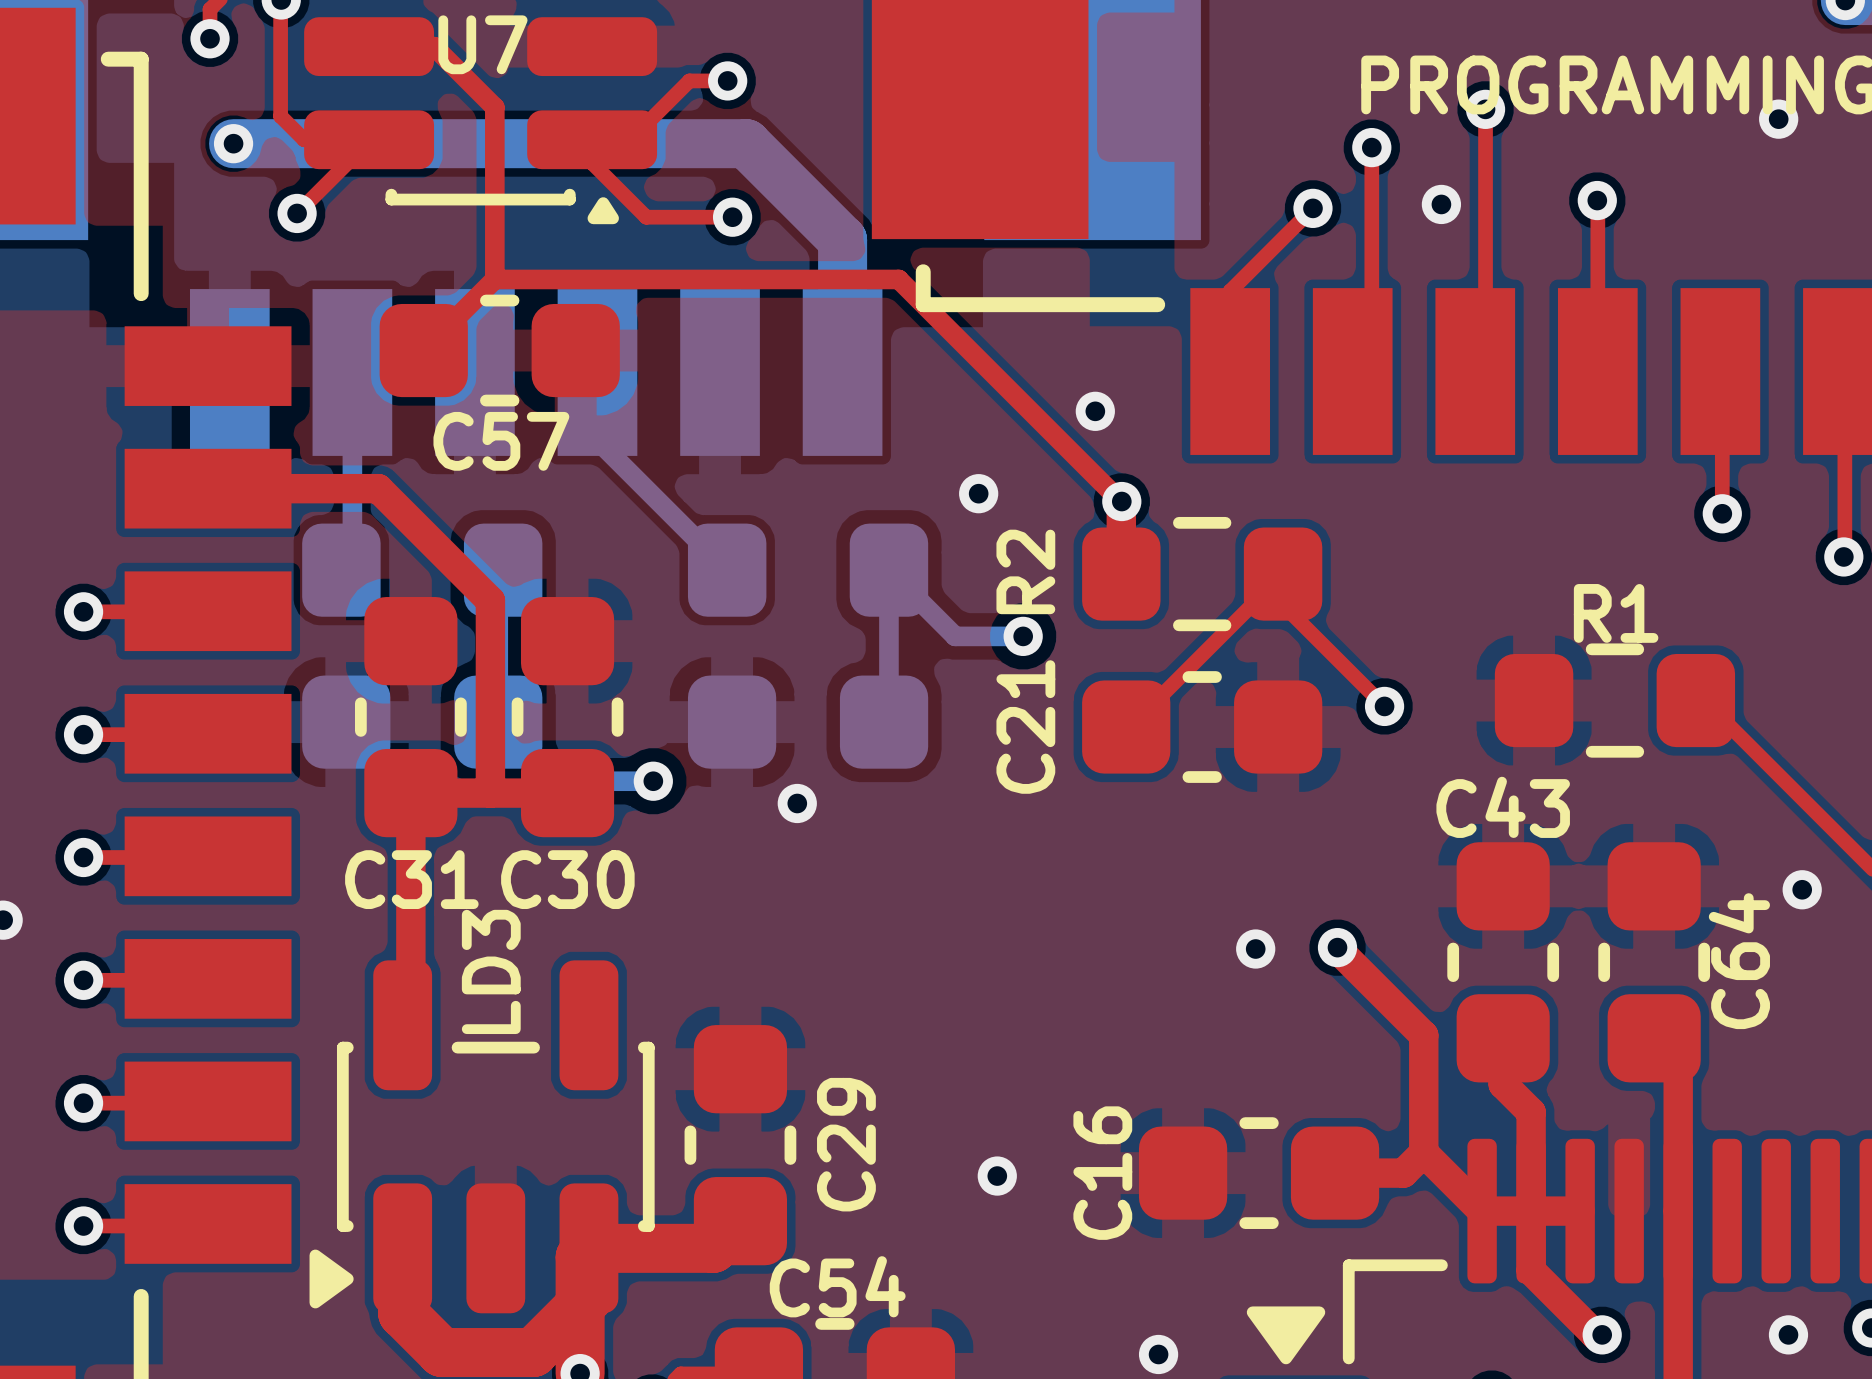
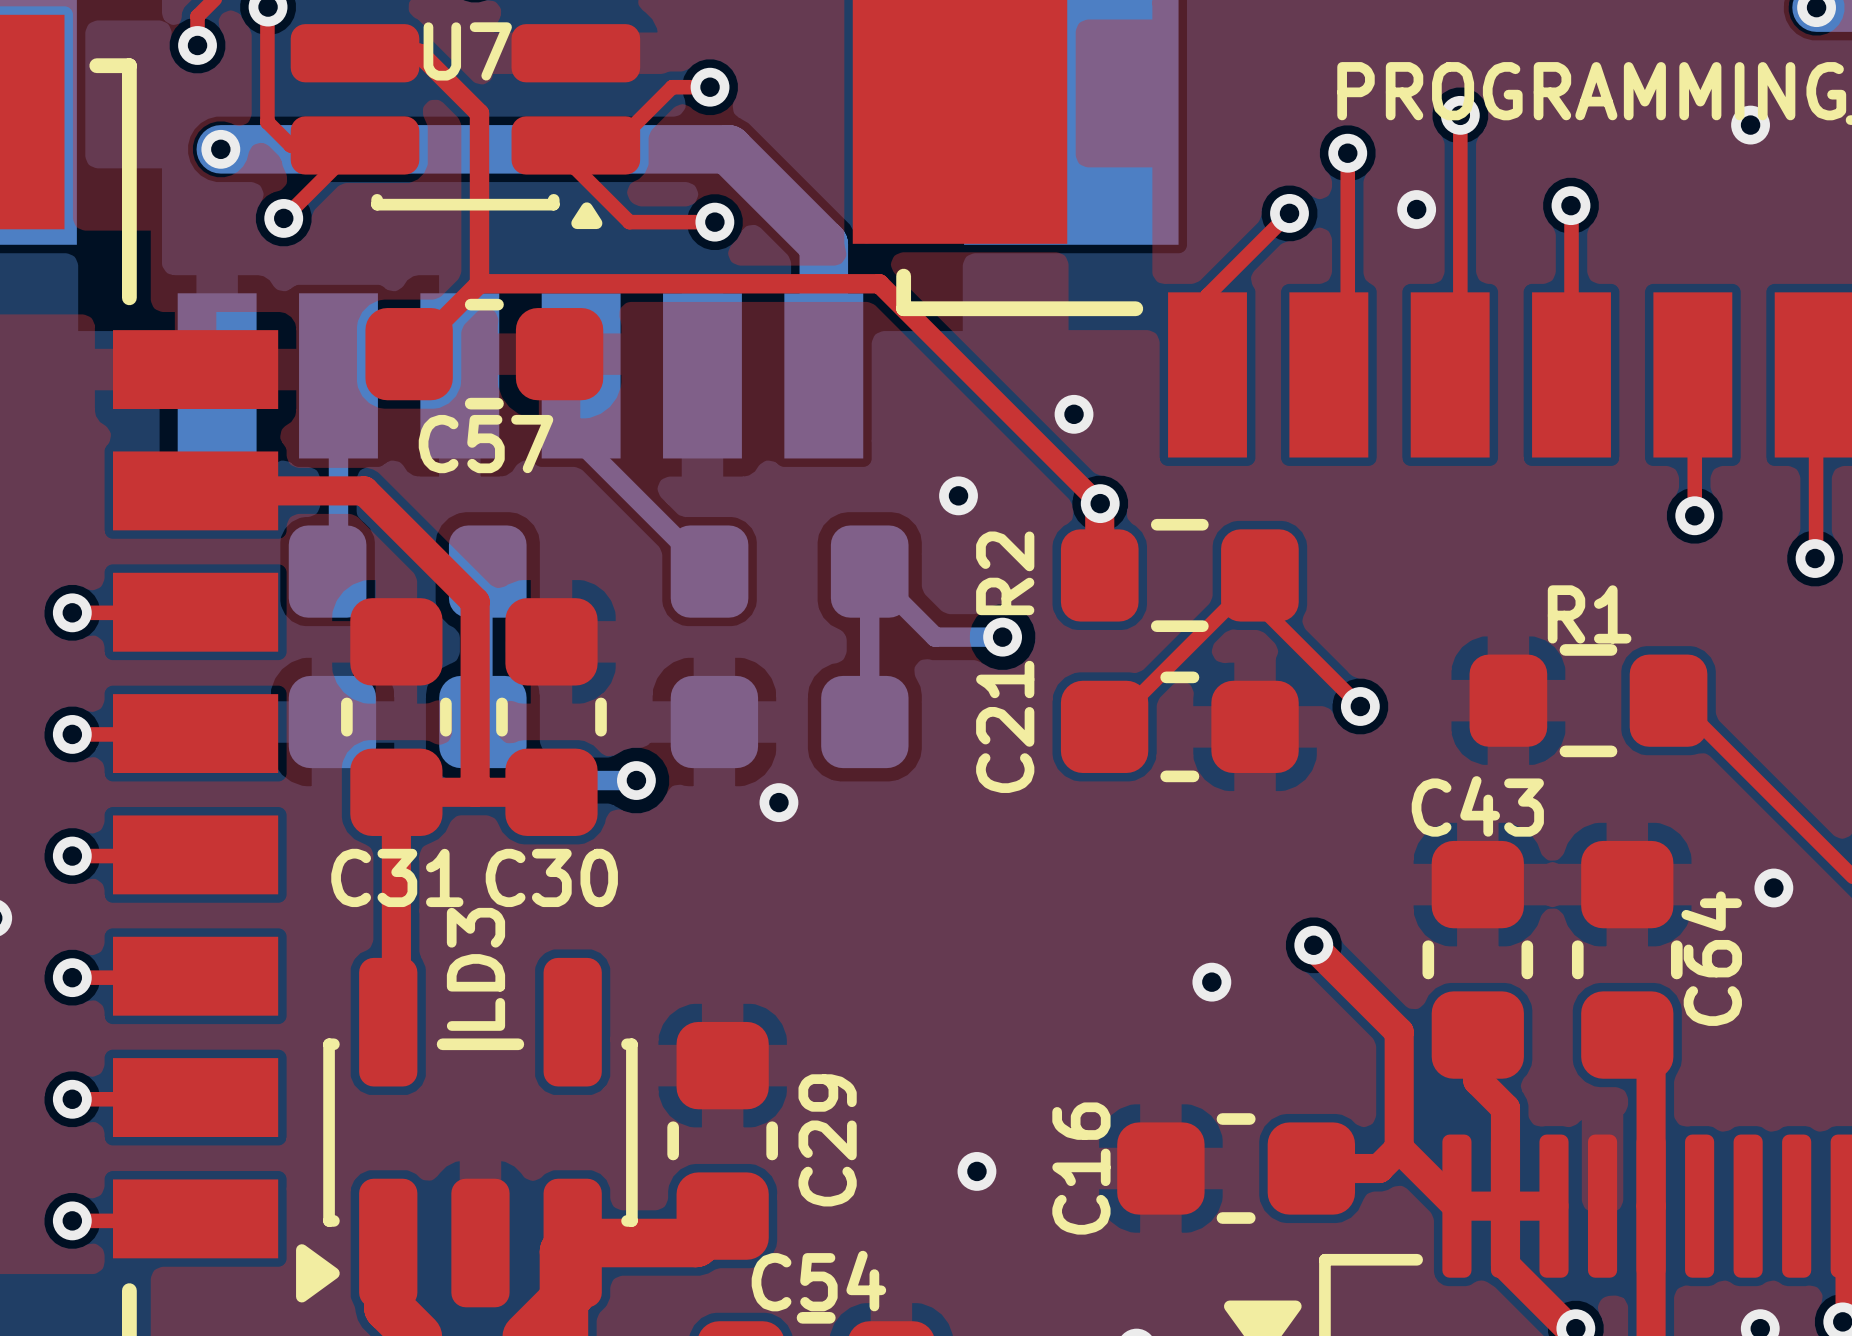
via position: (1255, 949) -> (1211, 982)

